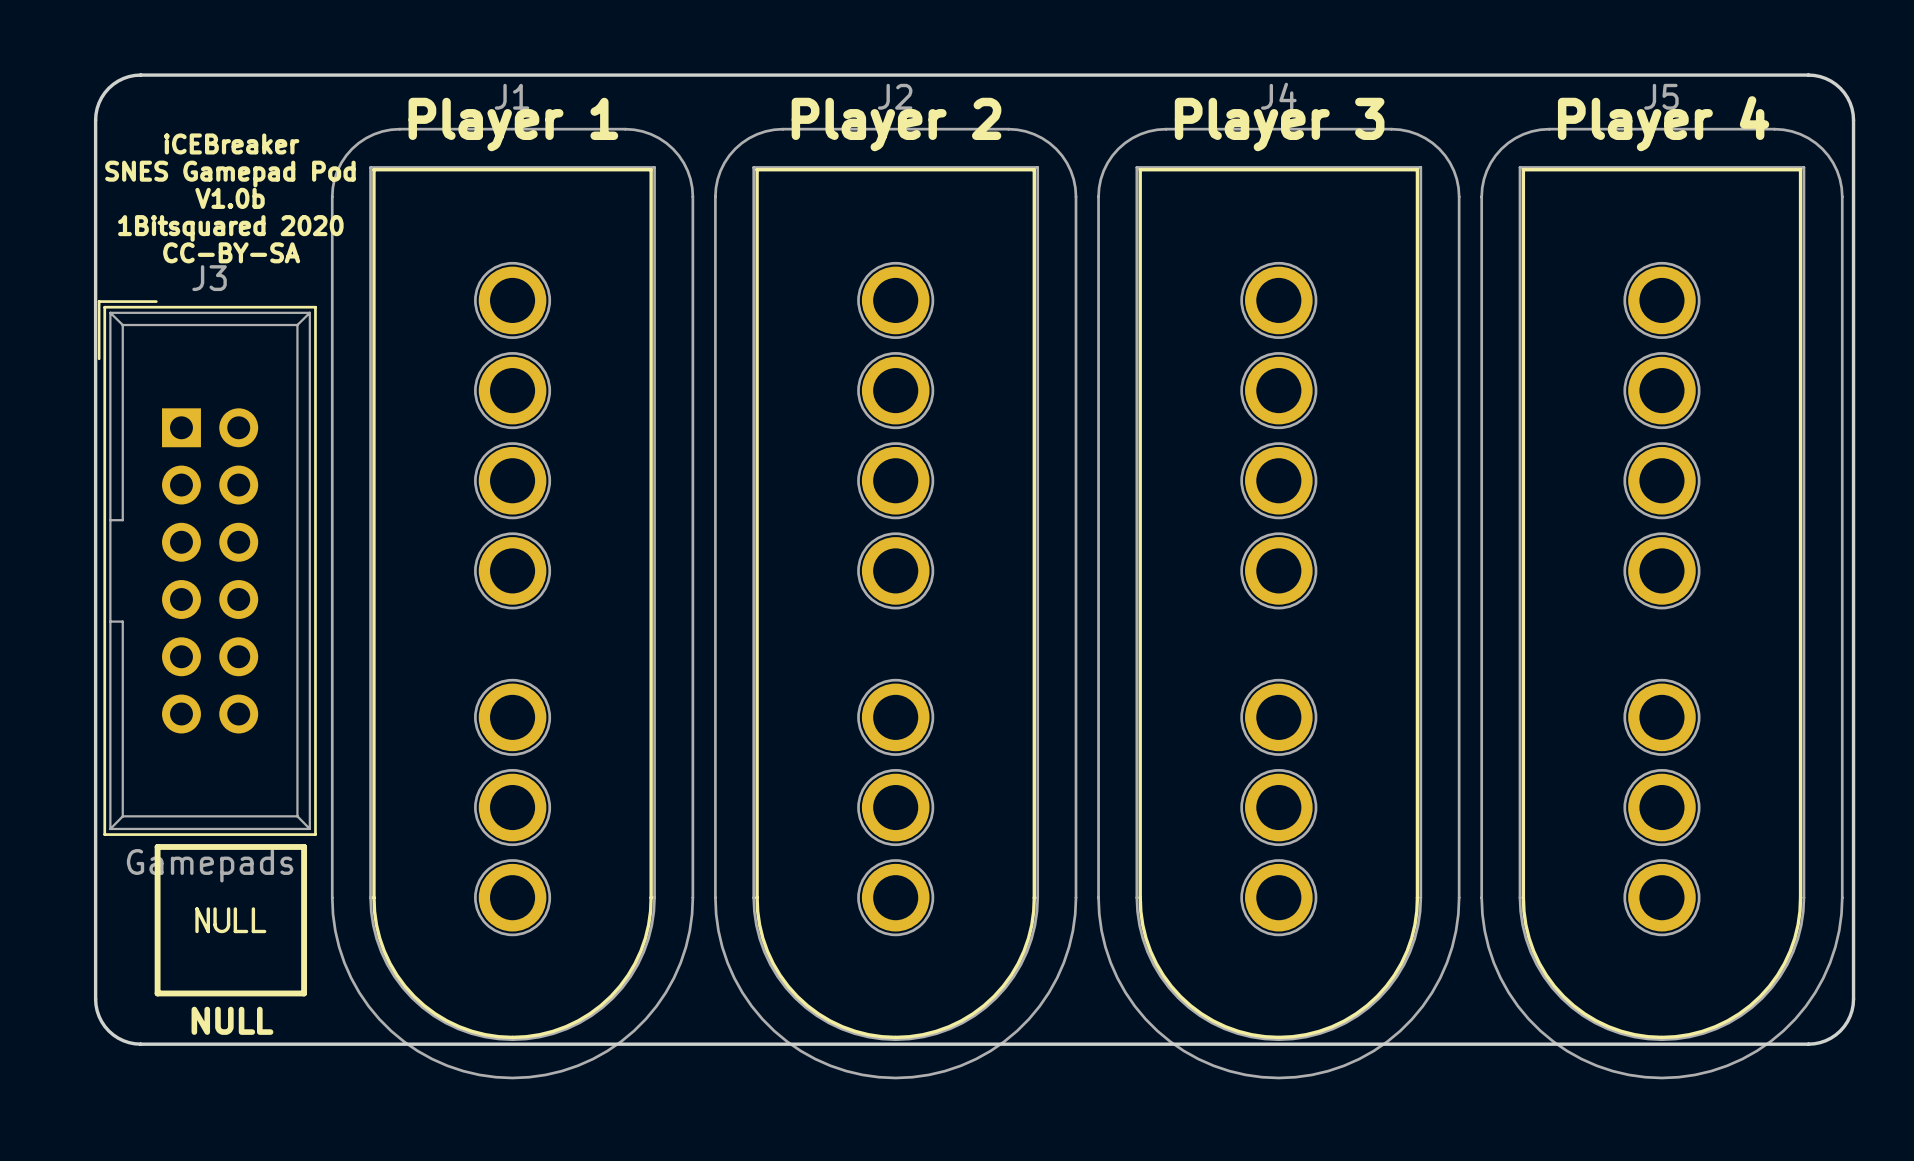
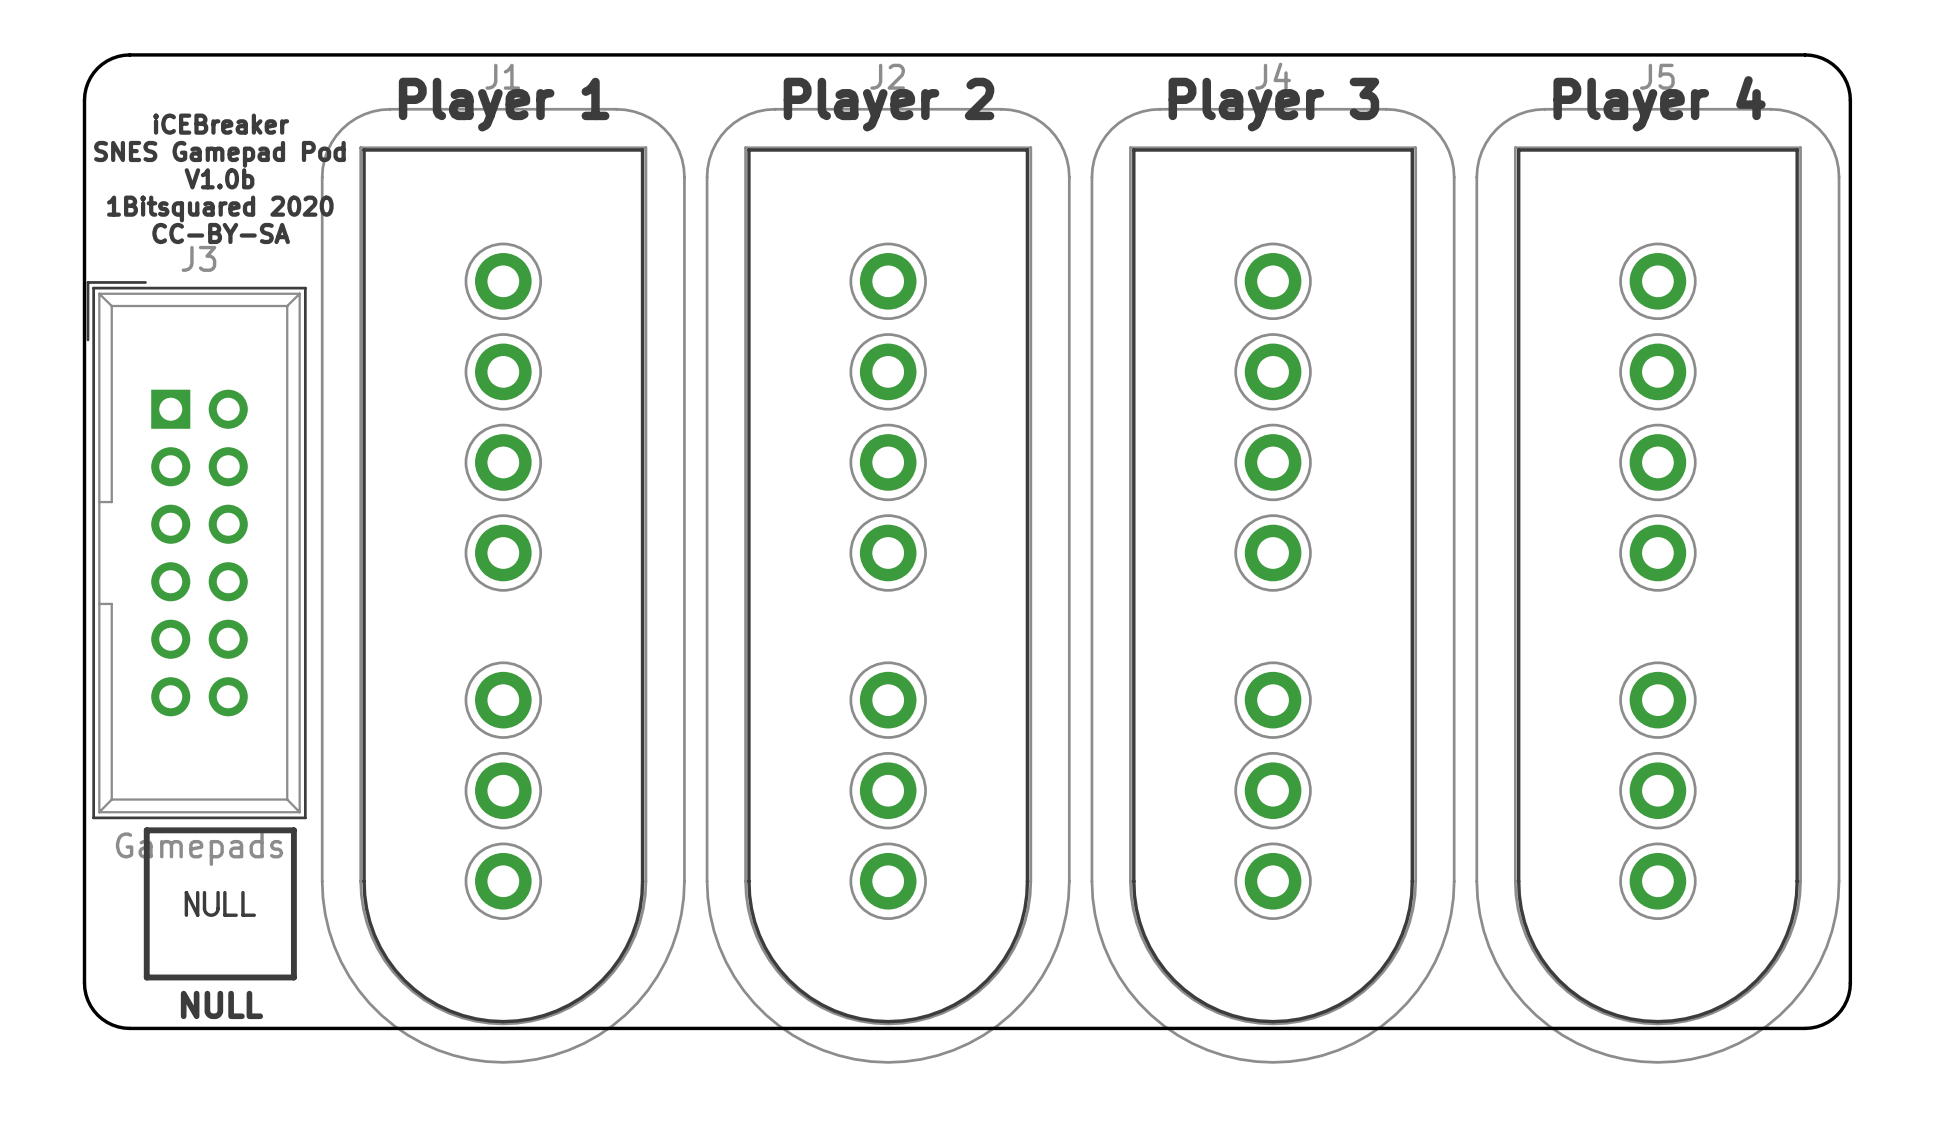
J1 footprint: [330, 127, 695, 1080] -> [320, 107, 686, 1064]
J2 footprint: [714, 127, 1078, 1080] -> [705, 107, 1071, 1064]
J4 footprint: [1097, 127, 1461, 1080] -> [1090, 107, 1456, 1064]
J5 footprint: [1480, 127, 1844, 1080] -> [1475, 107, 1841, 1064]

